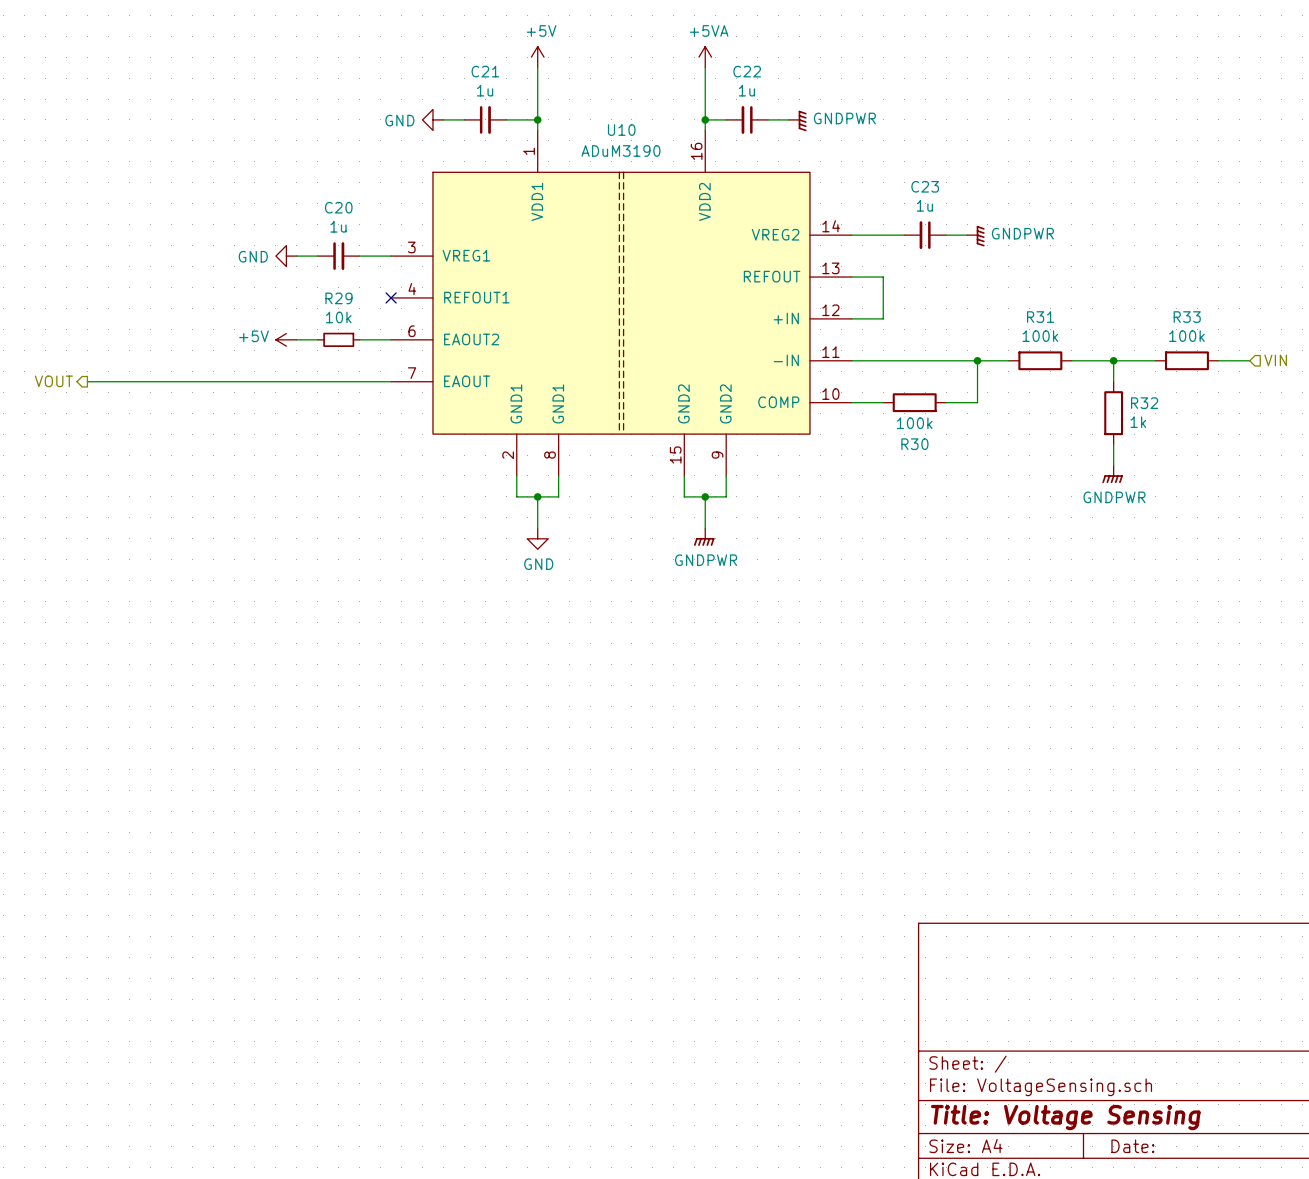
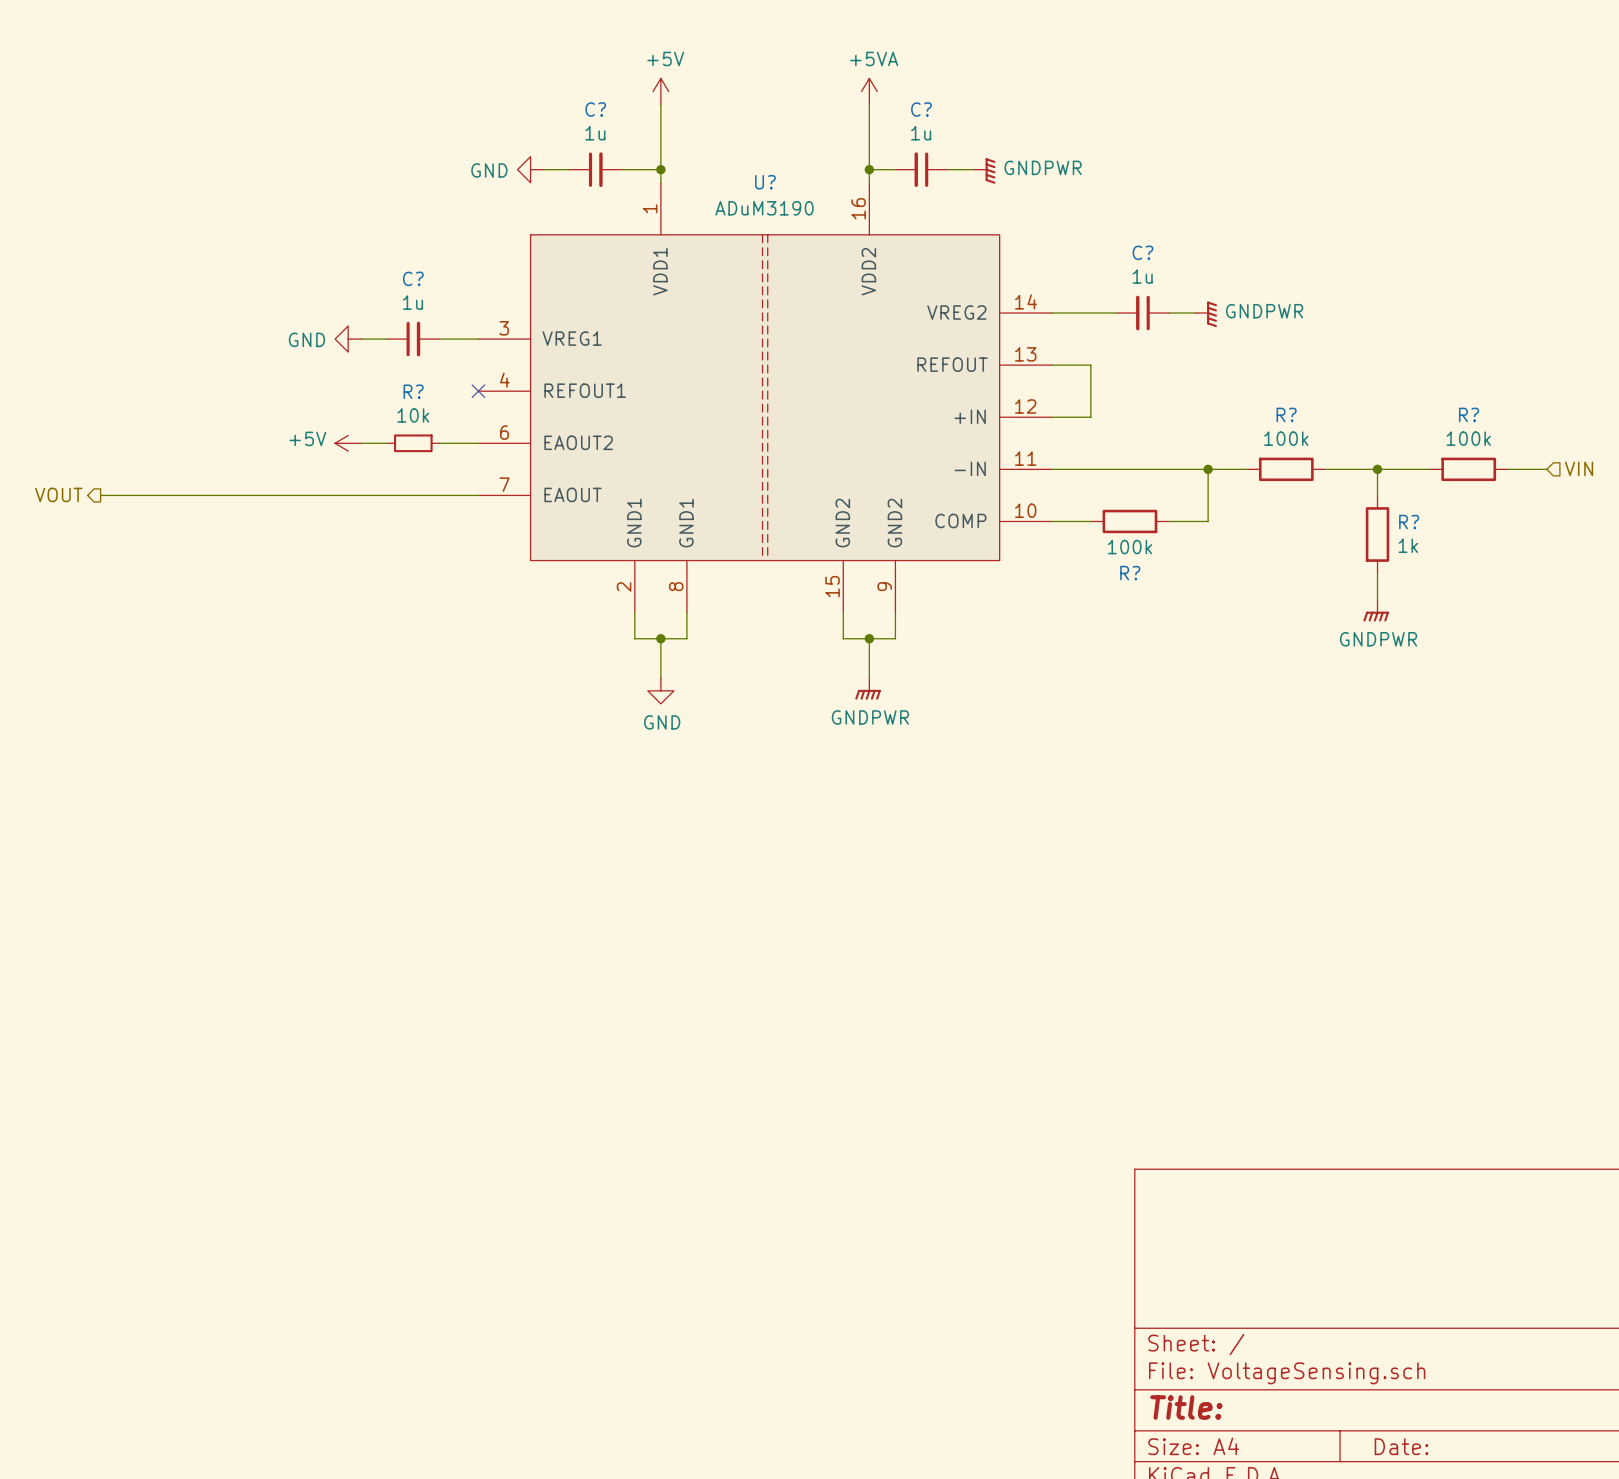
C21 name: C21 (485, 71) -> C? (595, 109)
C22 name: C22 (747, 71) -> C? (921, 109)
U10 name: U10 (621, 130) -> U? (765, 182)
C23 name: C23 (925, 186) -> C? (1142, 252)
C20 name: C20 (338, 207) -> C? (413, 278)
R29 name: R29 (338, 298) -> R? (413, 391)
R31 name: R31 (1040, 317) -> R? (1286, 414)
R33 name: R33 (1187, 317) -> R? (1469, 414)
R32 name: R32 (1144, 403) -> R? (1409, 522)
R30 name: R30 (914, 444) -> R? (1130, 573)
title block: Title: Voltage Sensing (1065, 1117) -> Title: (1186, 1407)

